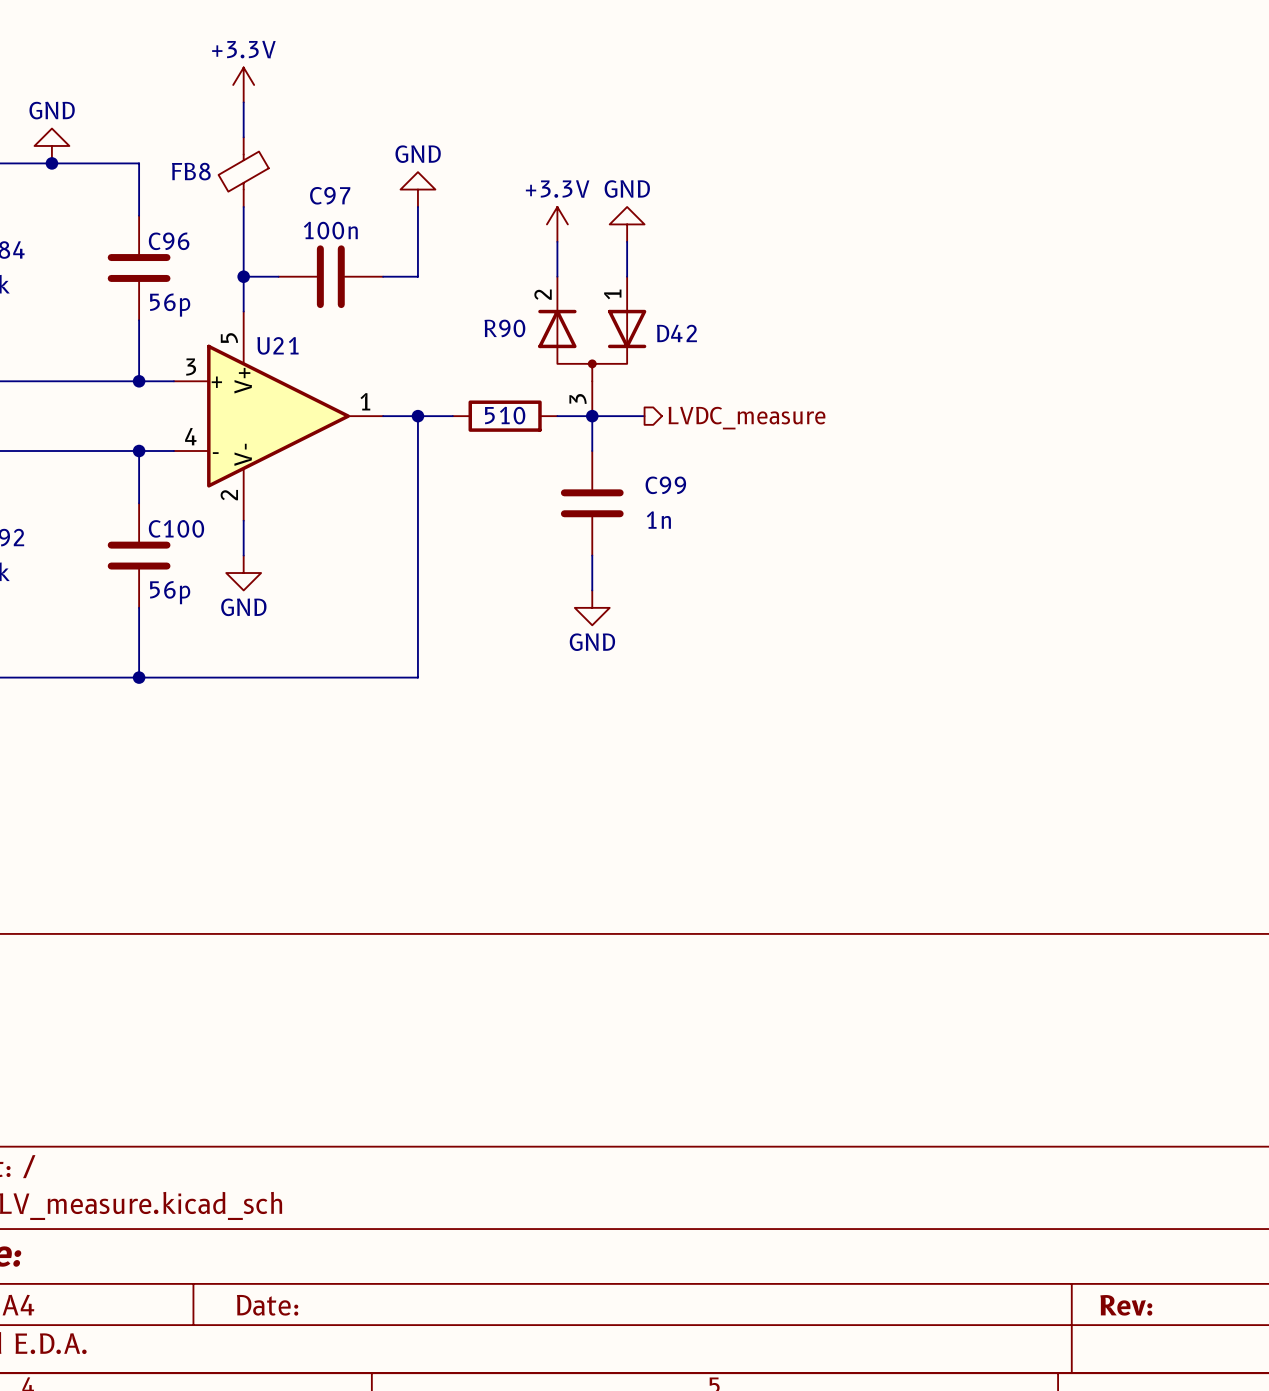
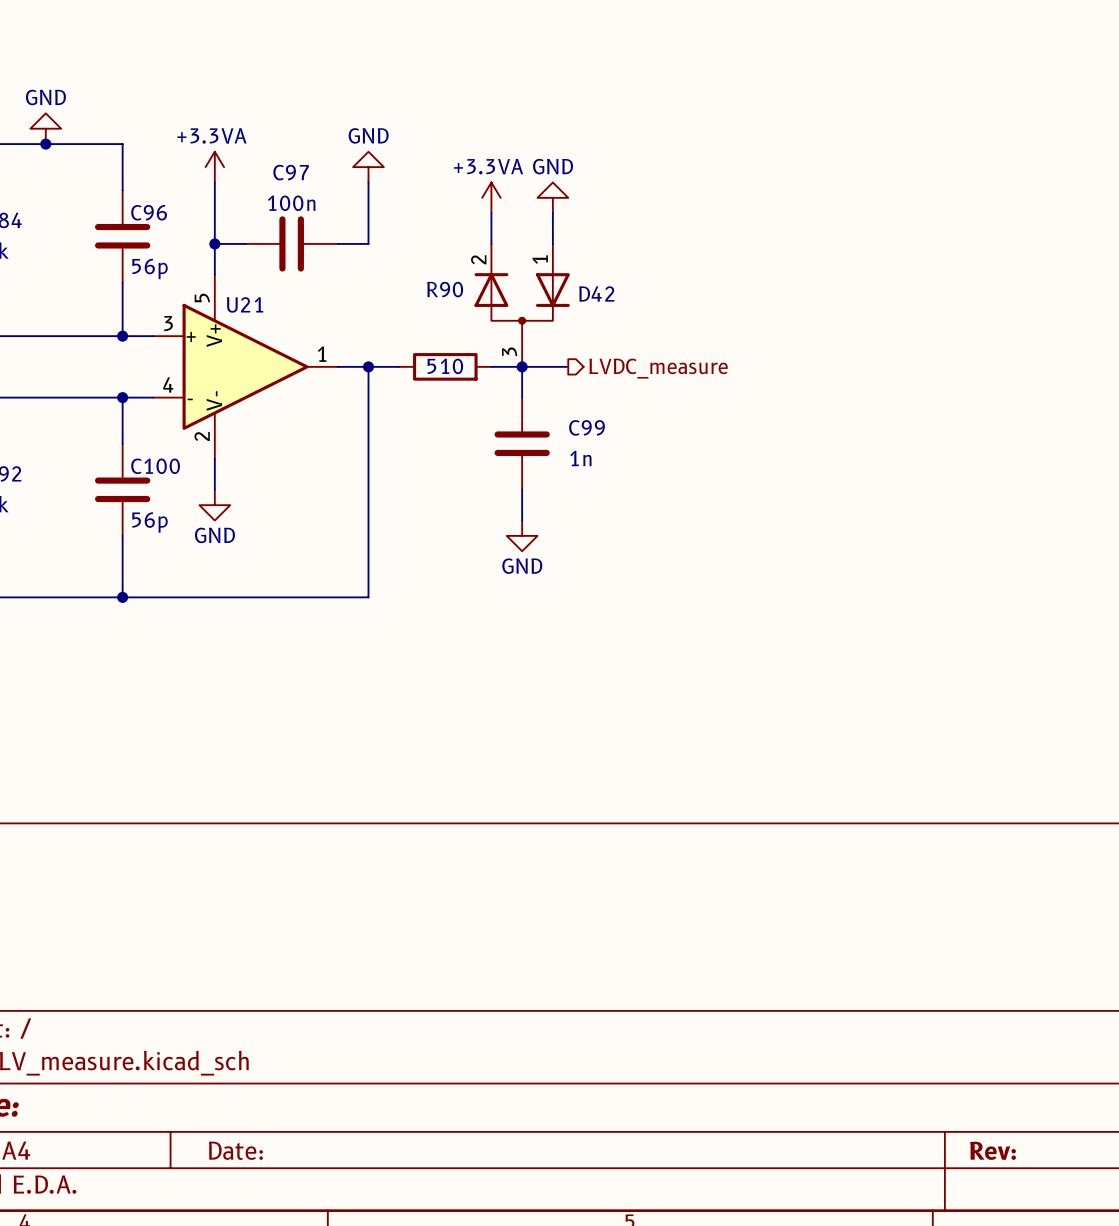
power symbol: +3.3V (243, 84) -> none
wire: (243, 102) (243, 137) -> none
FB8: (243, 172) -> none
power symbol: none -> +3.3VA (214, 167)
power symbol: +3.3V (557, 224) -> +3.3VA (491, 197)

